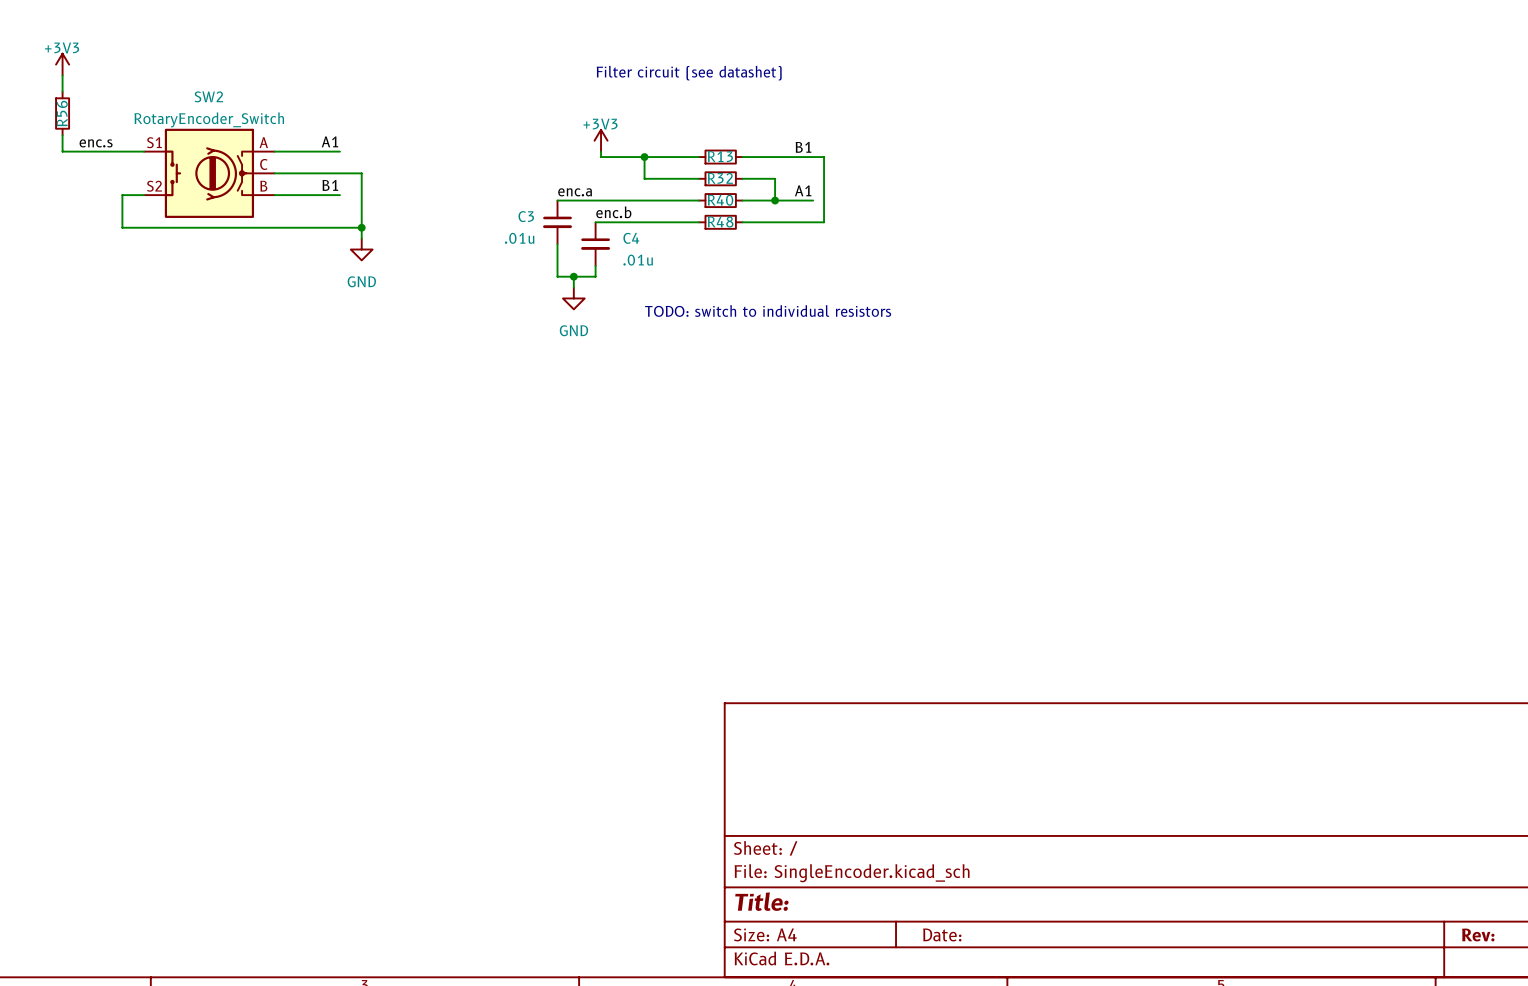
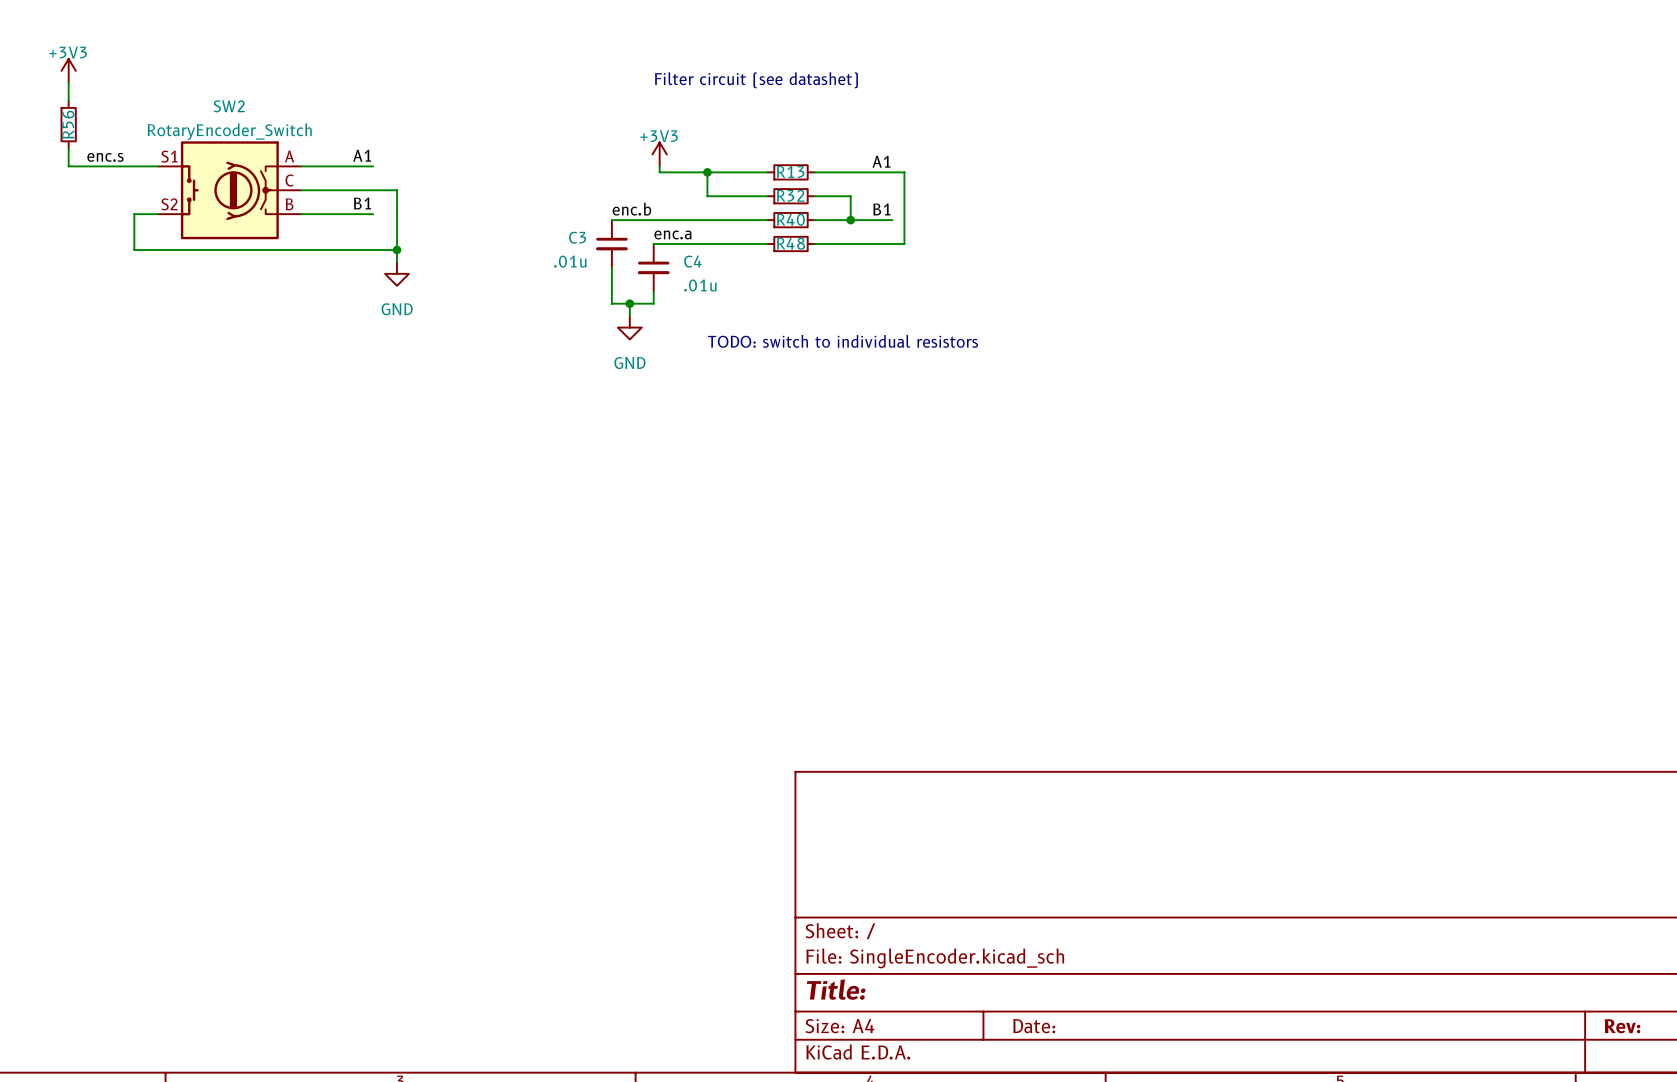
label: B1 (803, 147) -> A1 (881, 161)
label: A1 (803, 190) -> B1 (881, 209)
label: enc.a (575, 192) -> enc.b (631, 209)
label: enc.b (613, 212) -> enc.a (673, 234)

